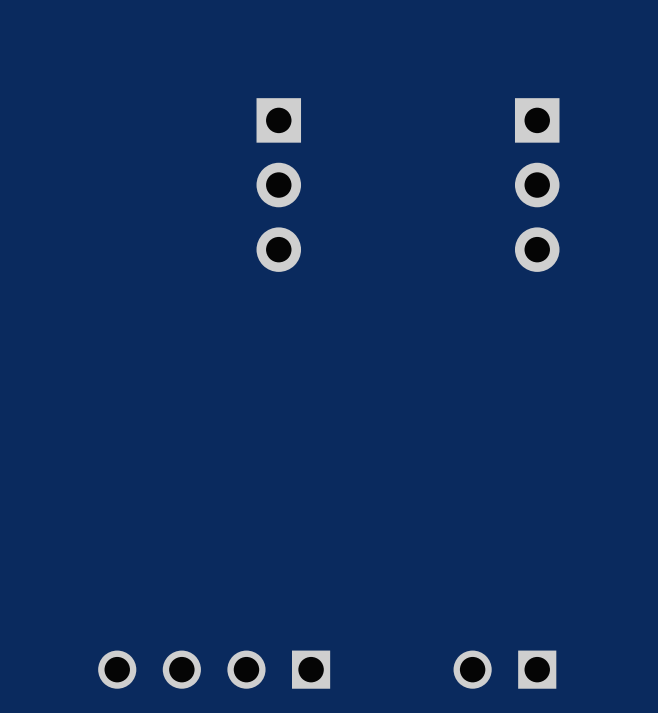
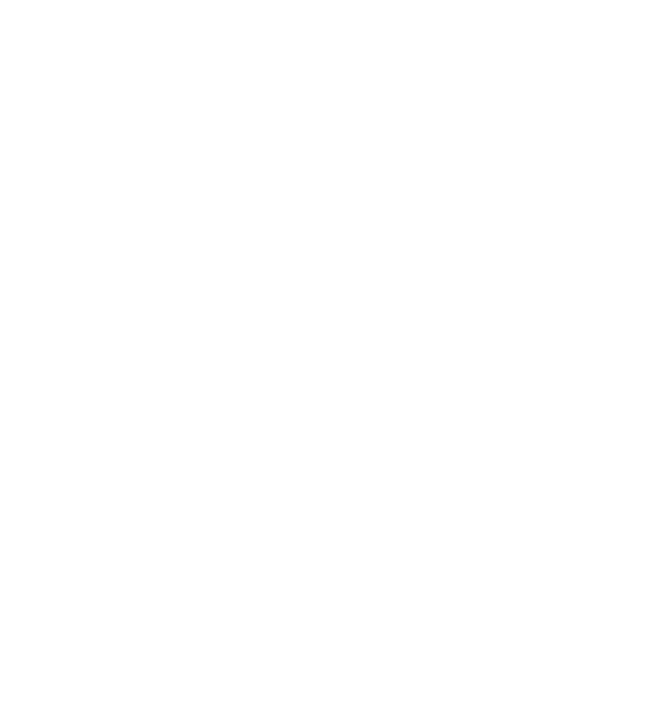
part: (278, 185) -> none
part: (537, 185) -> none
part: (214, 669) -> none
part: (504, 669) -> none

